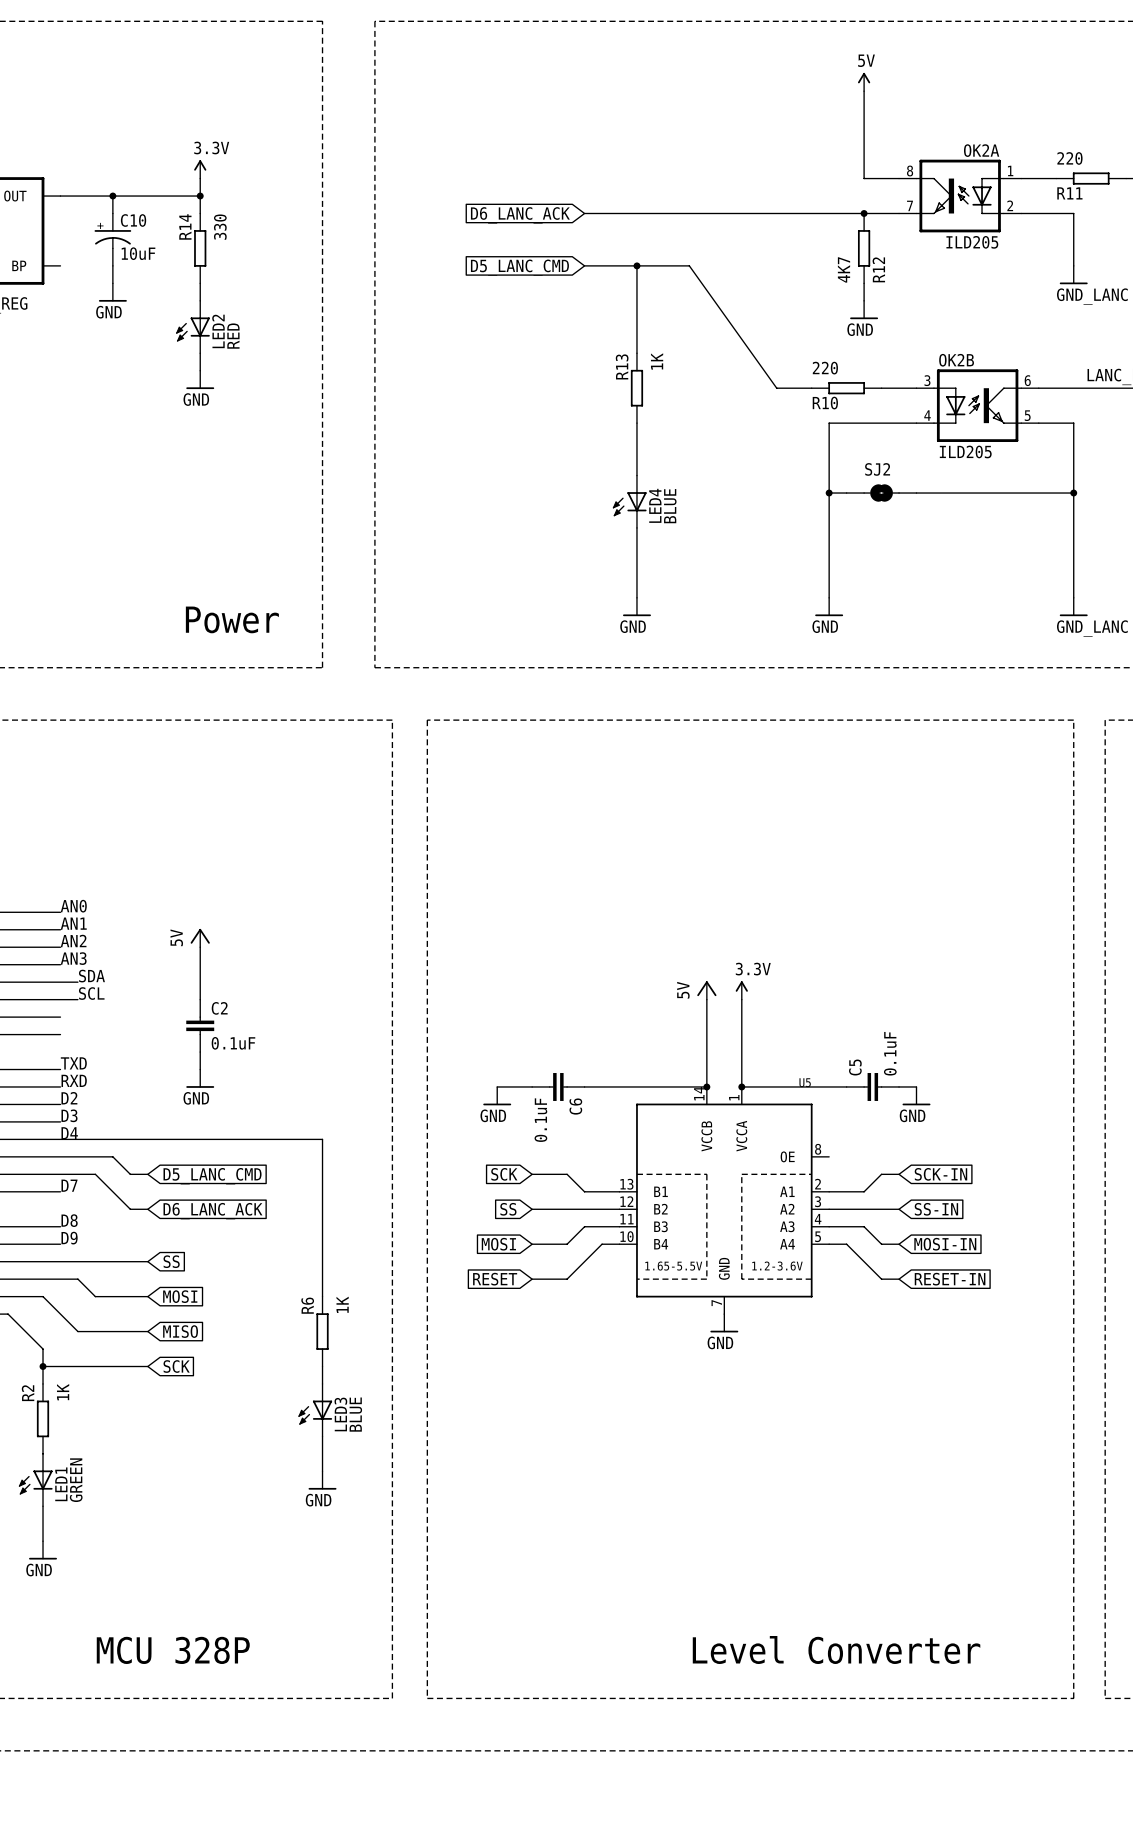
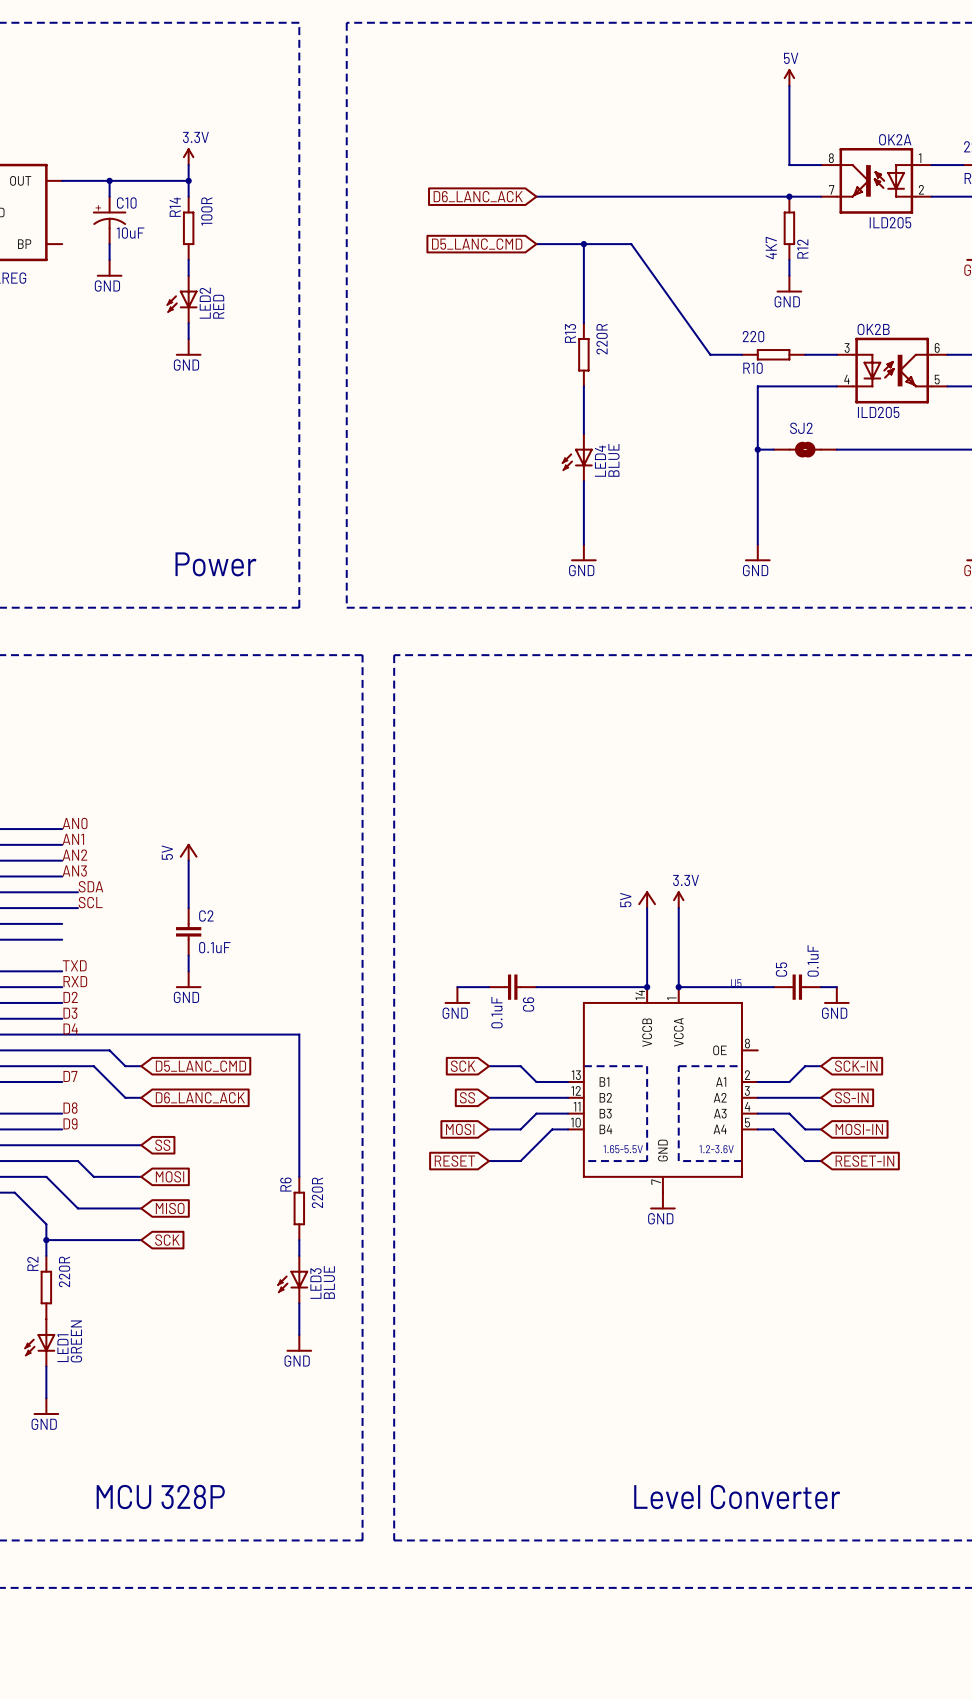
R14 value: 330 (220, 227) -> 100R (206, 211)
R13 value: 1K (657, 361) -> 220R (602, 339)
R6 value: 1K (342, 1304) -> 220R (317, 1192)
R2 value: 1K (63, 1392) -> 220R (64, 1271)

